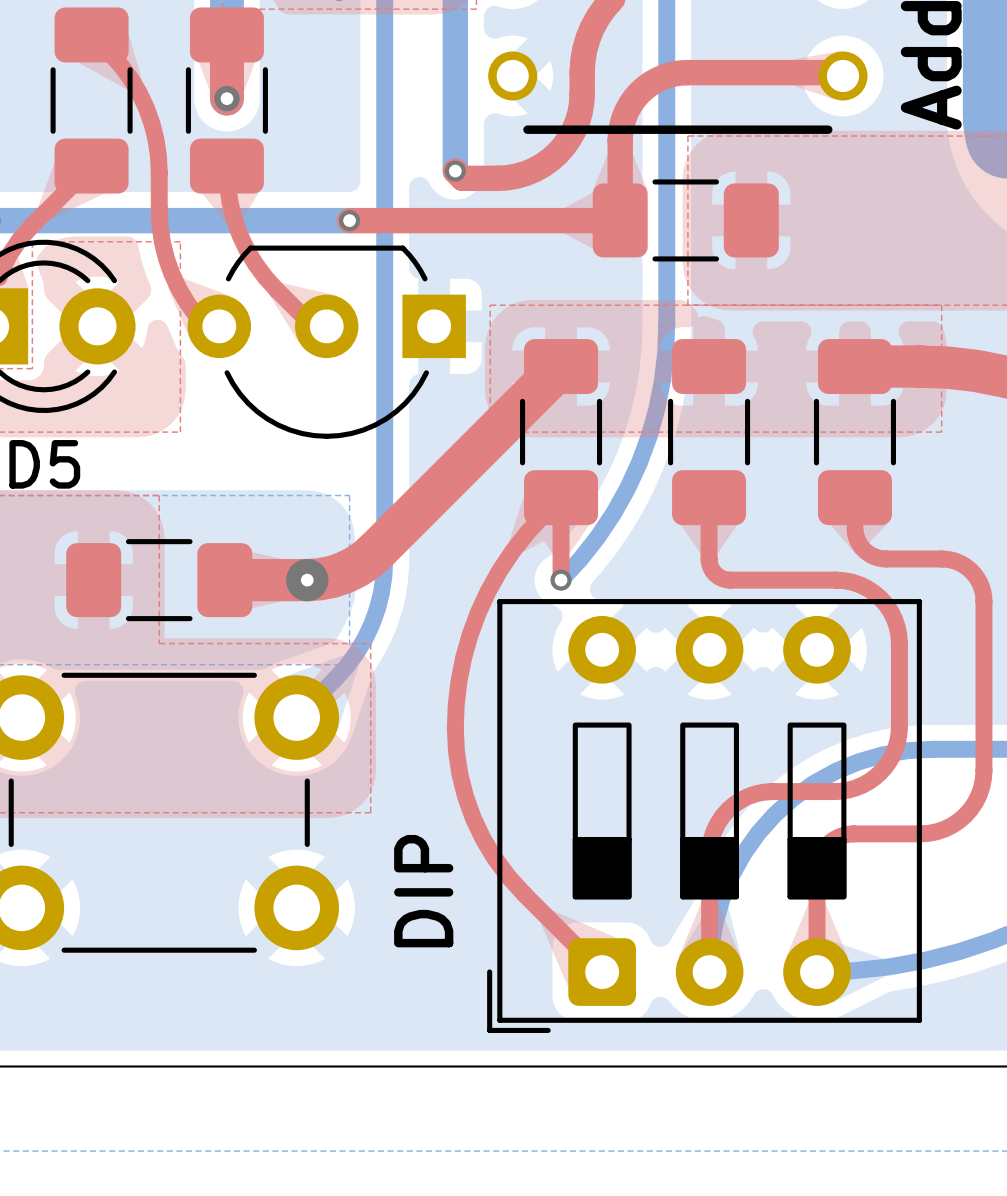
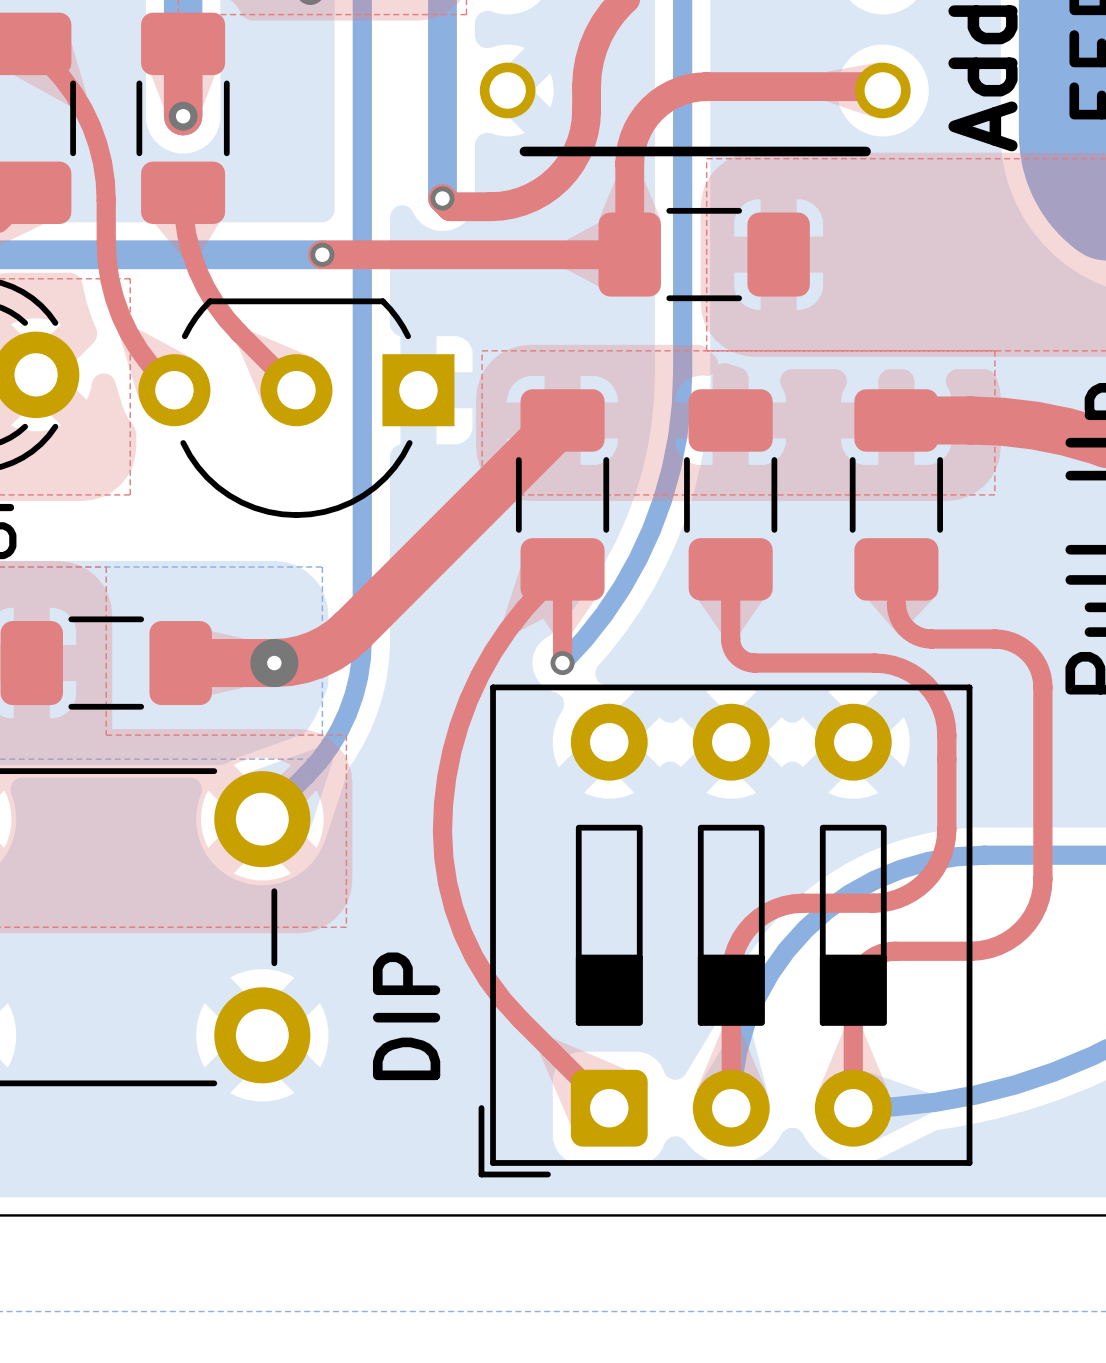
part position: (326, 342) -> (296, 408)

